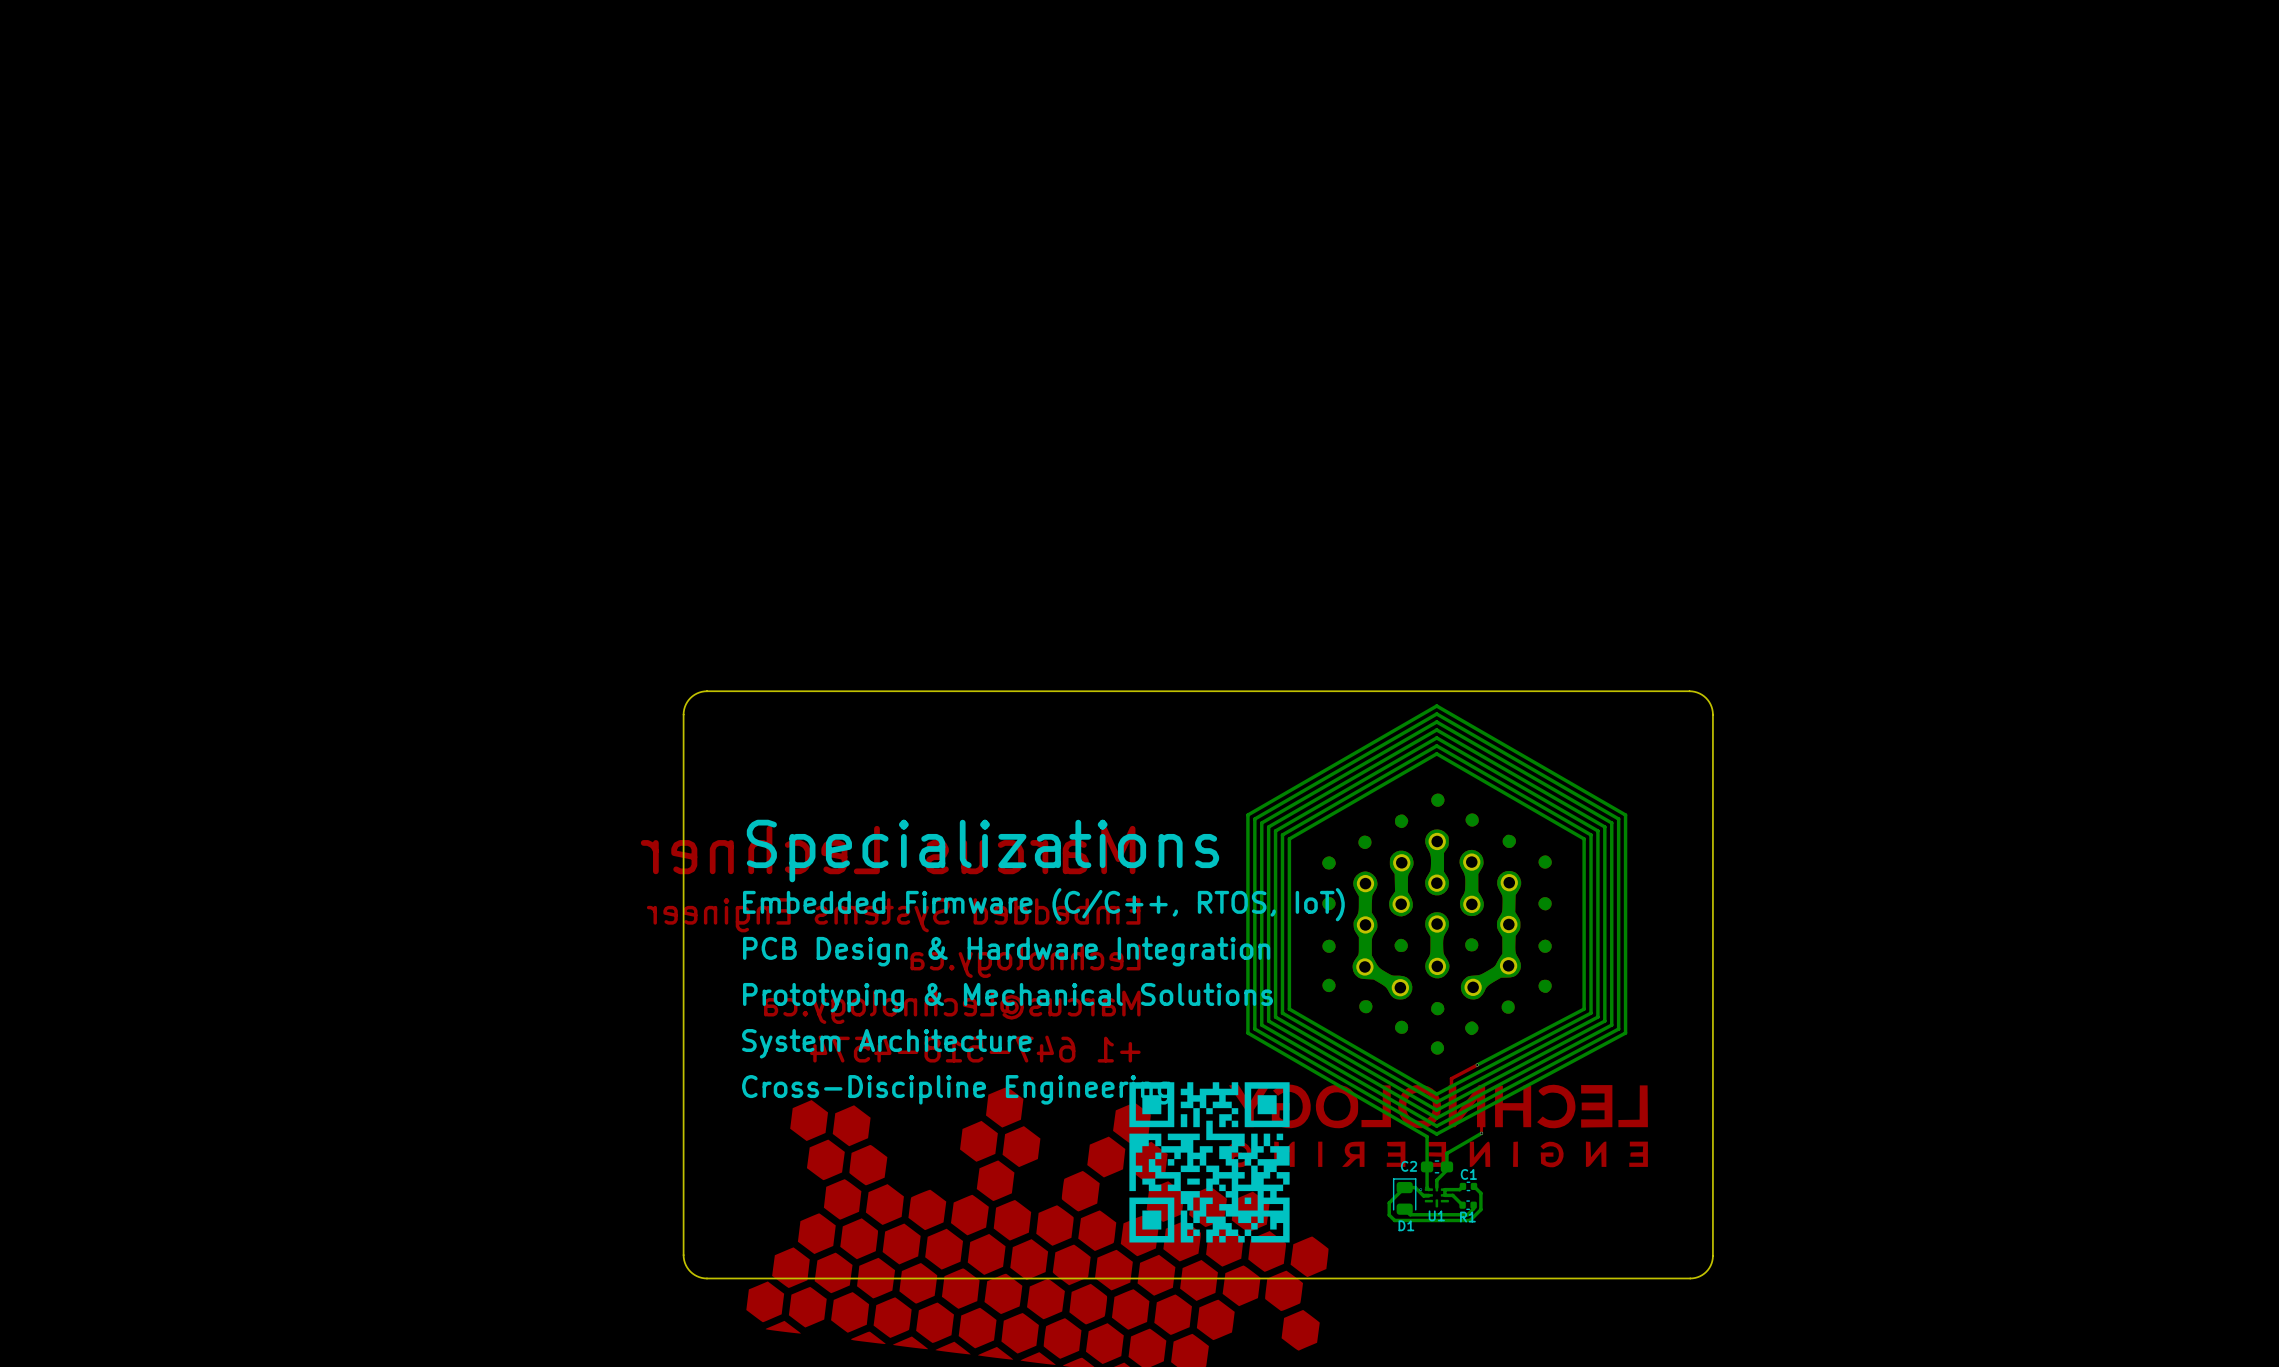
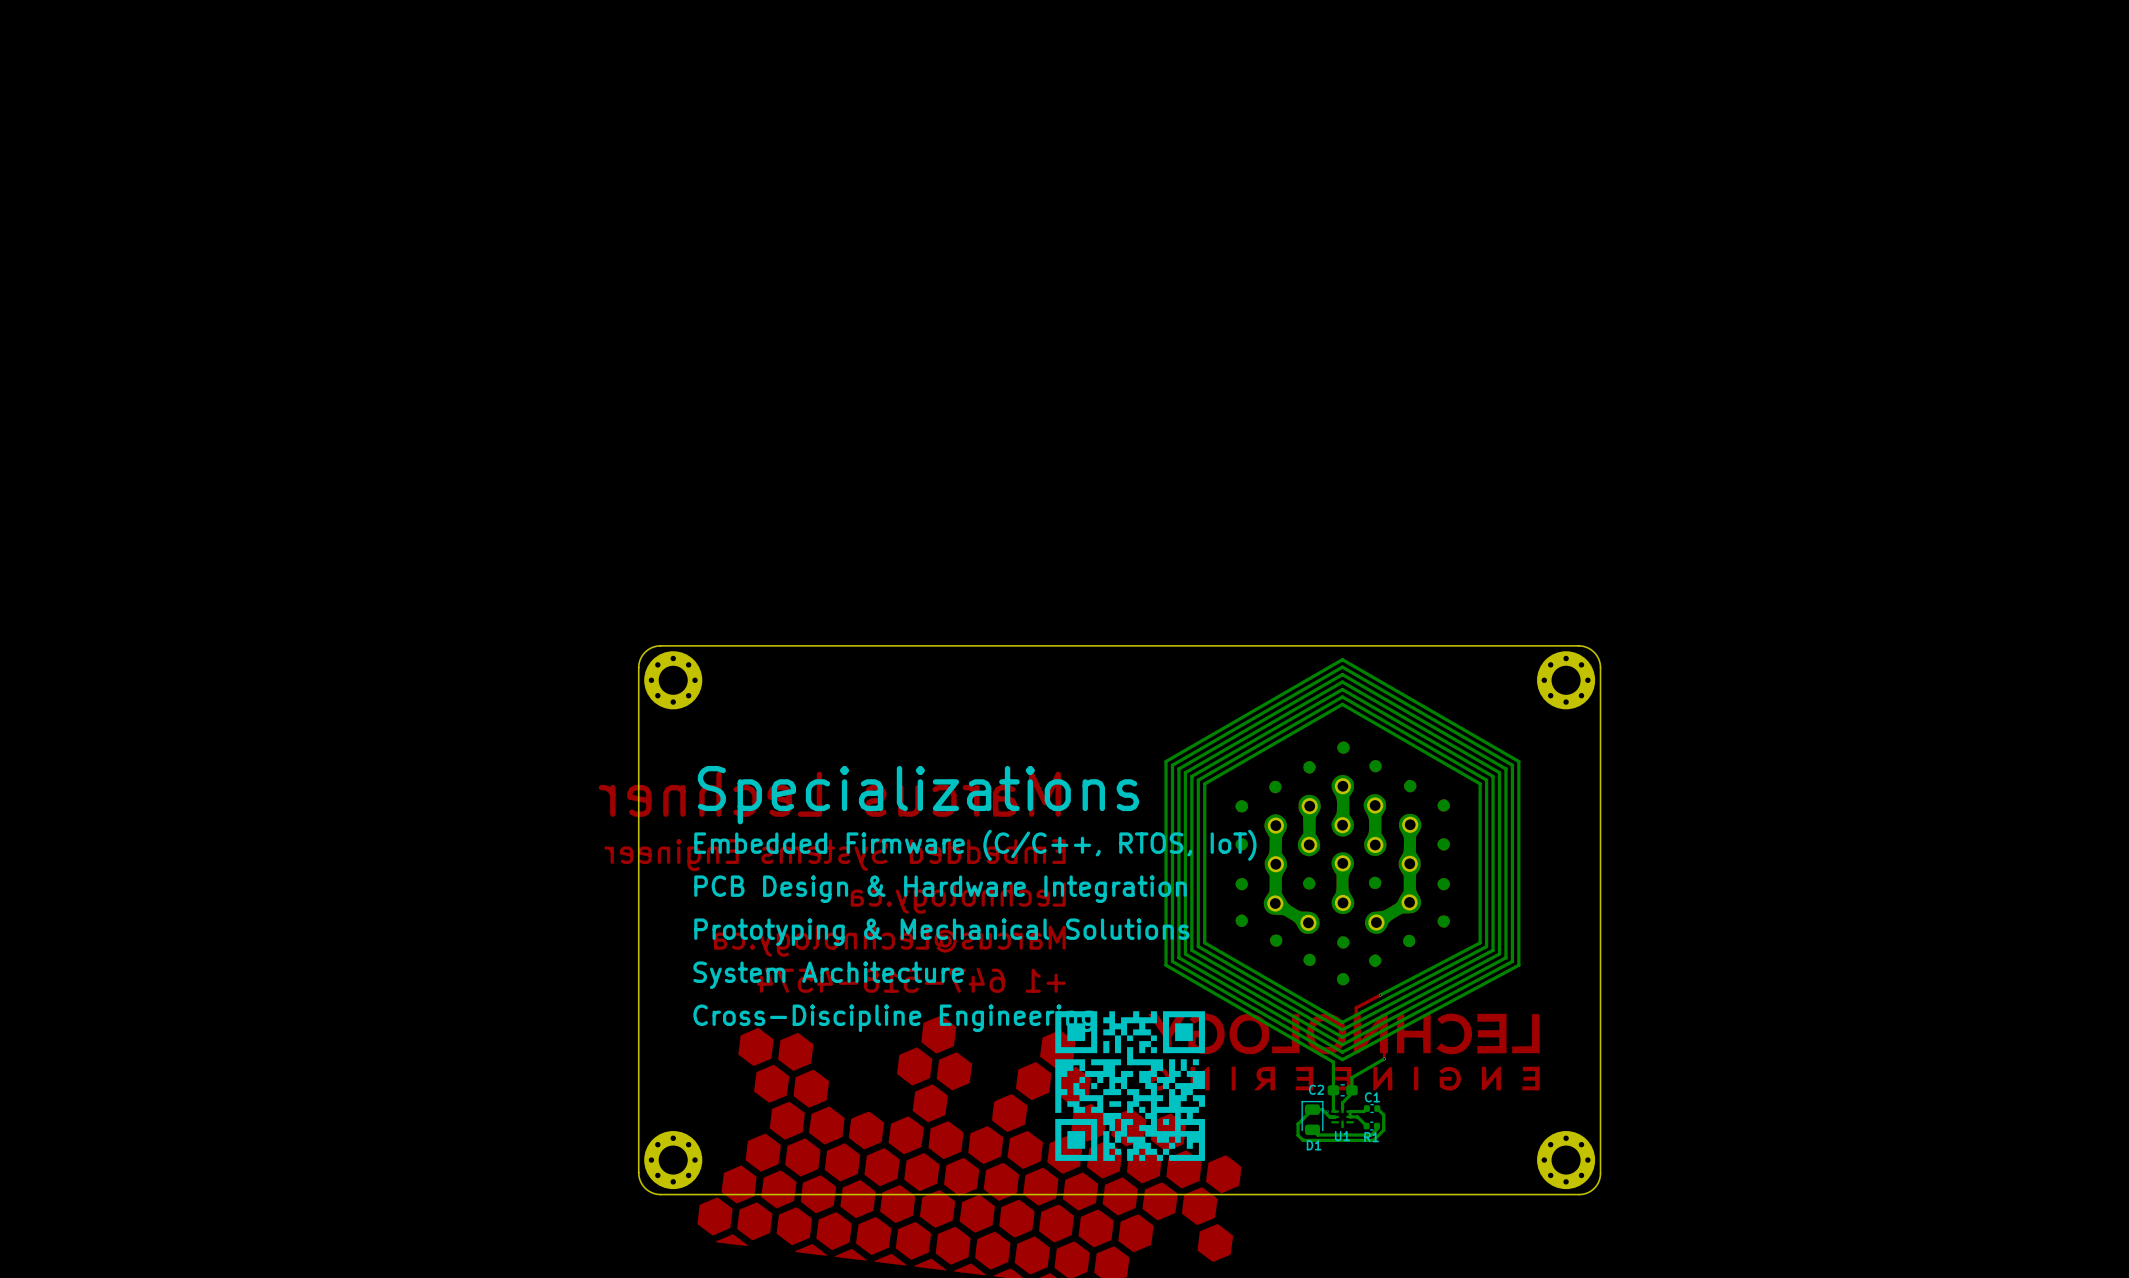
part: none -> (673, 680)
part: none -> (1566, 680)
part: none -> (673, 1160)
part: none -> (1566, 1160)

